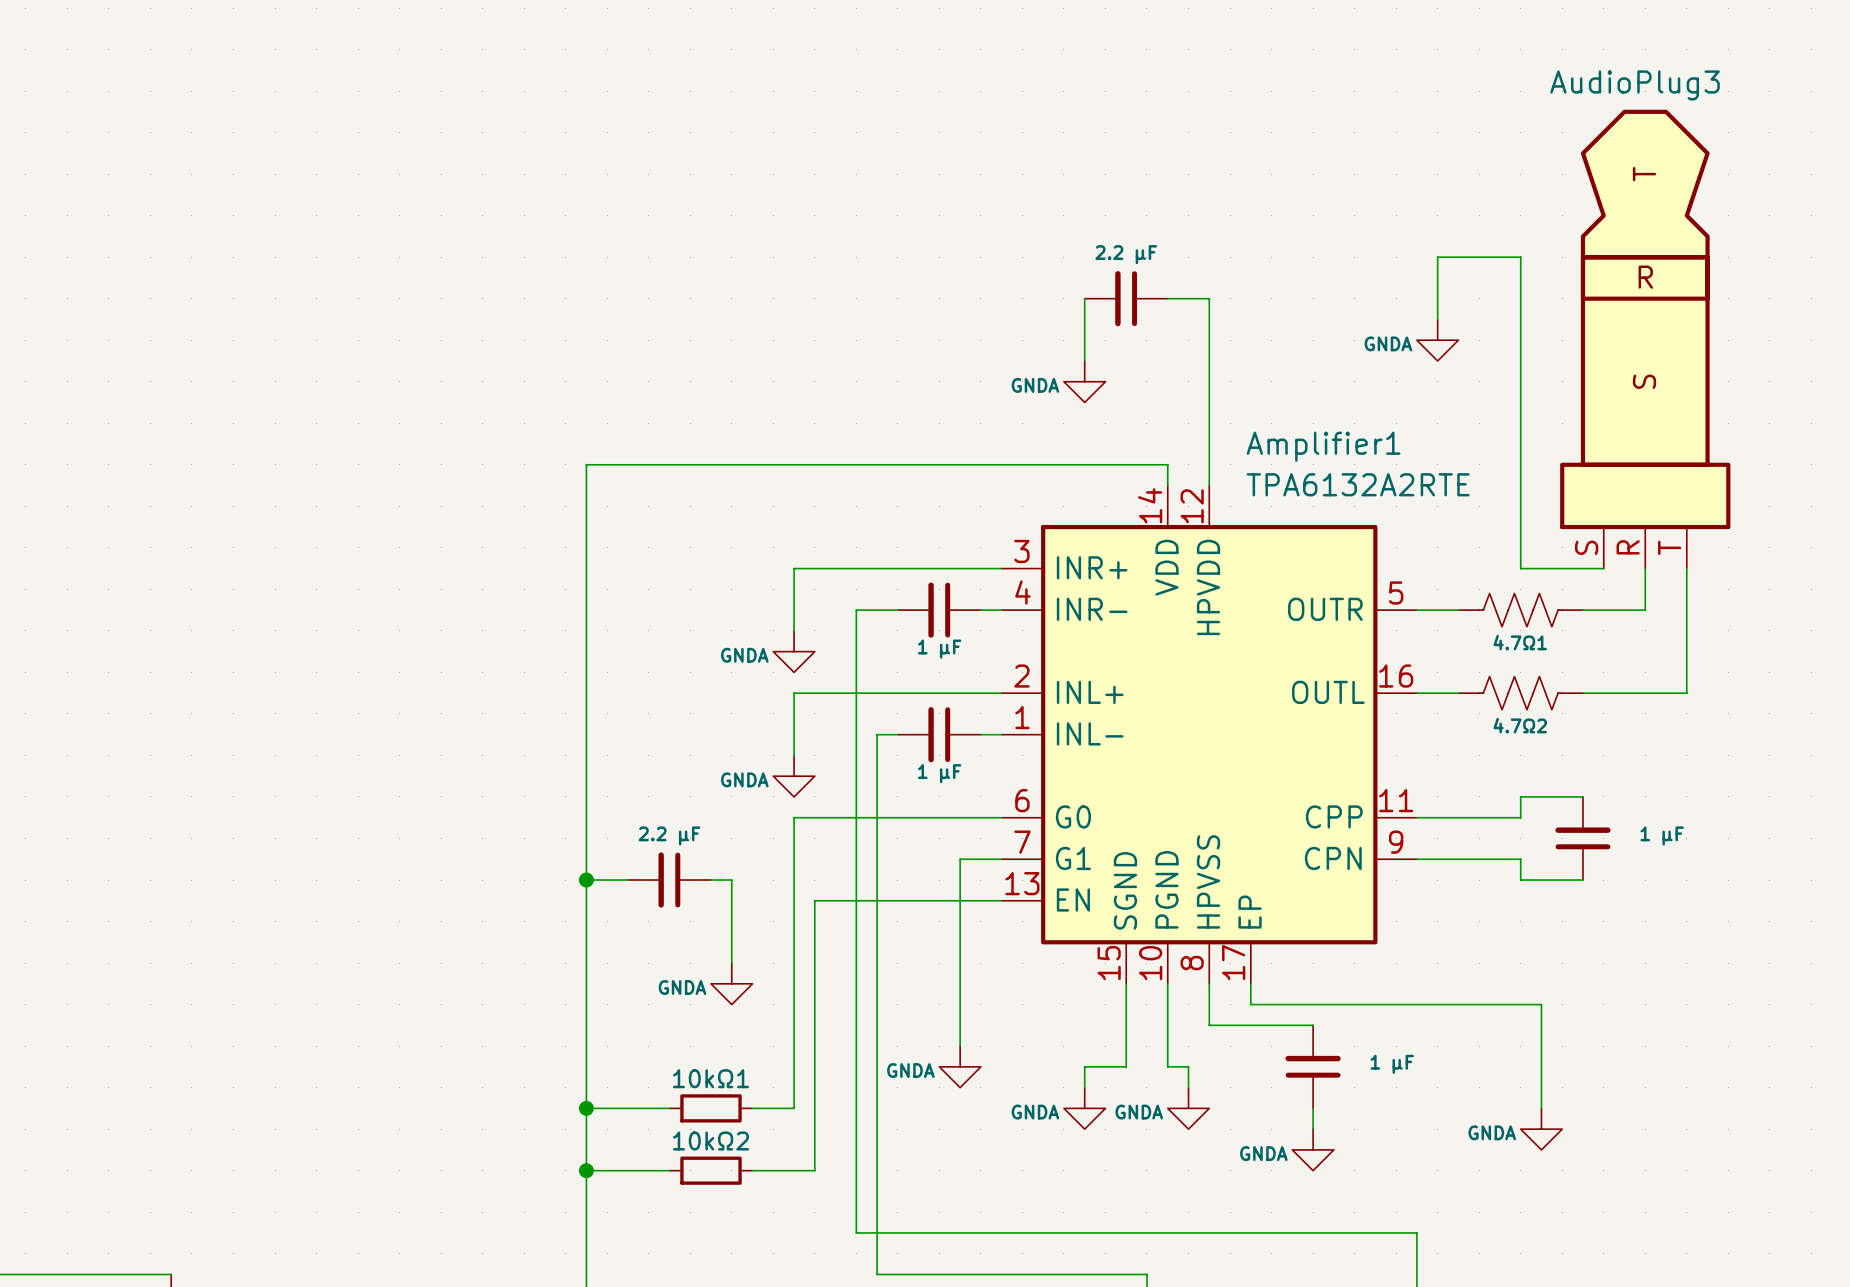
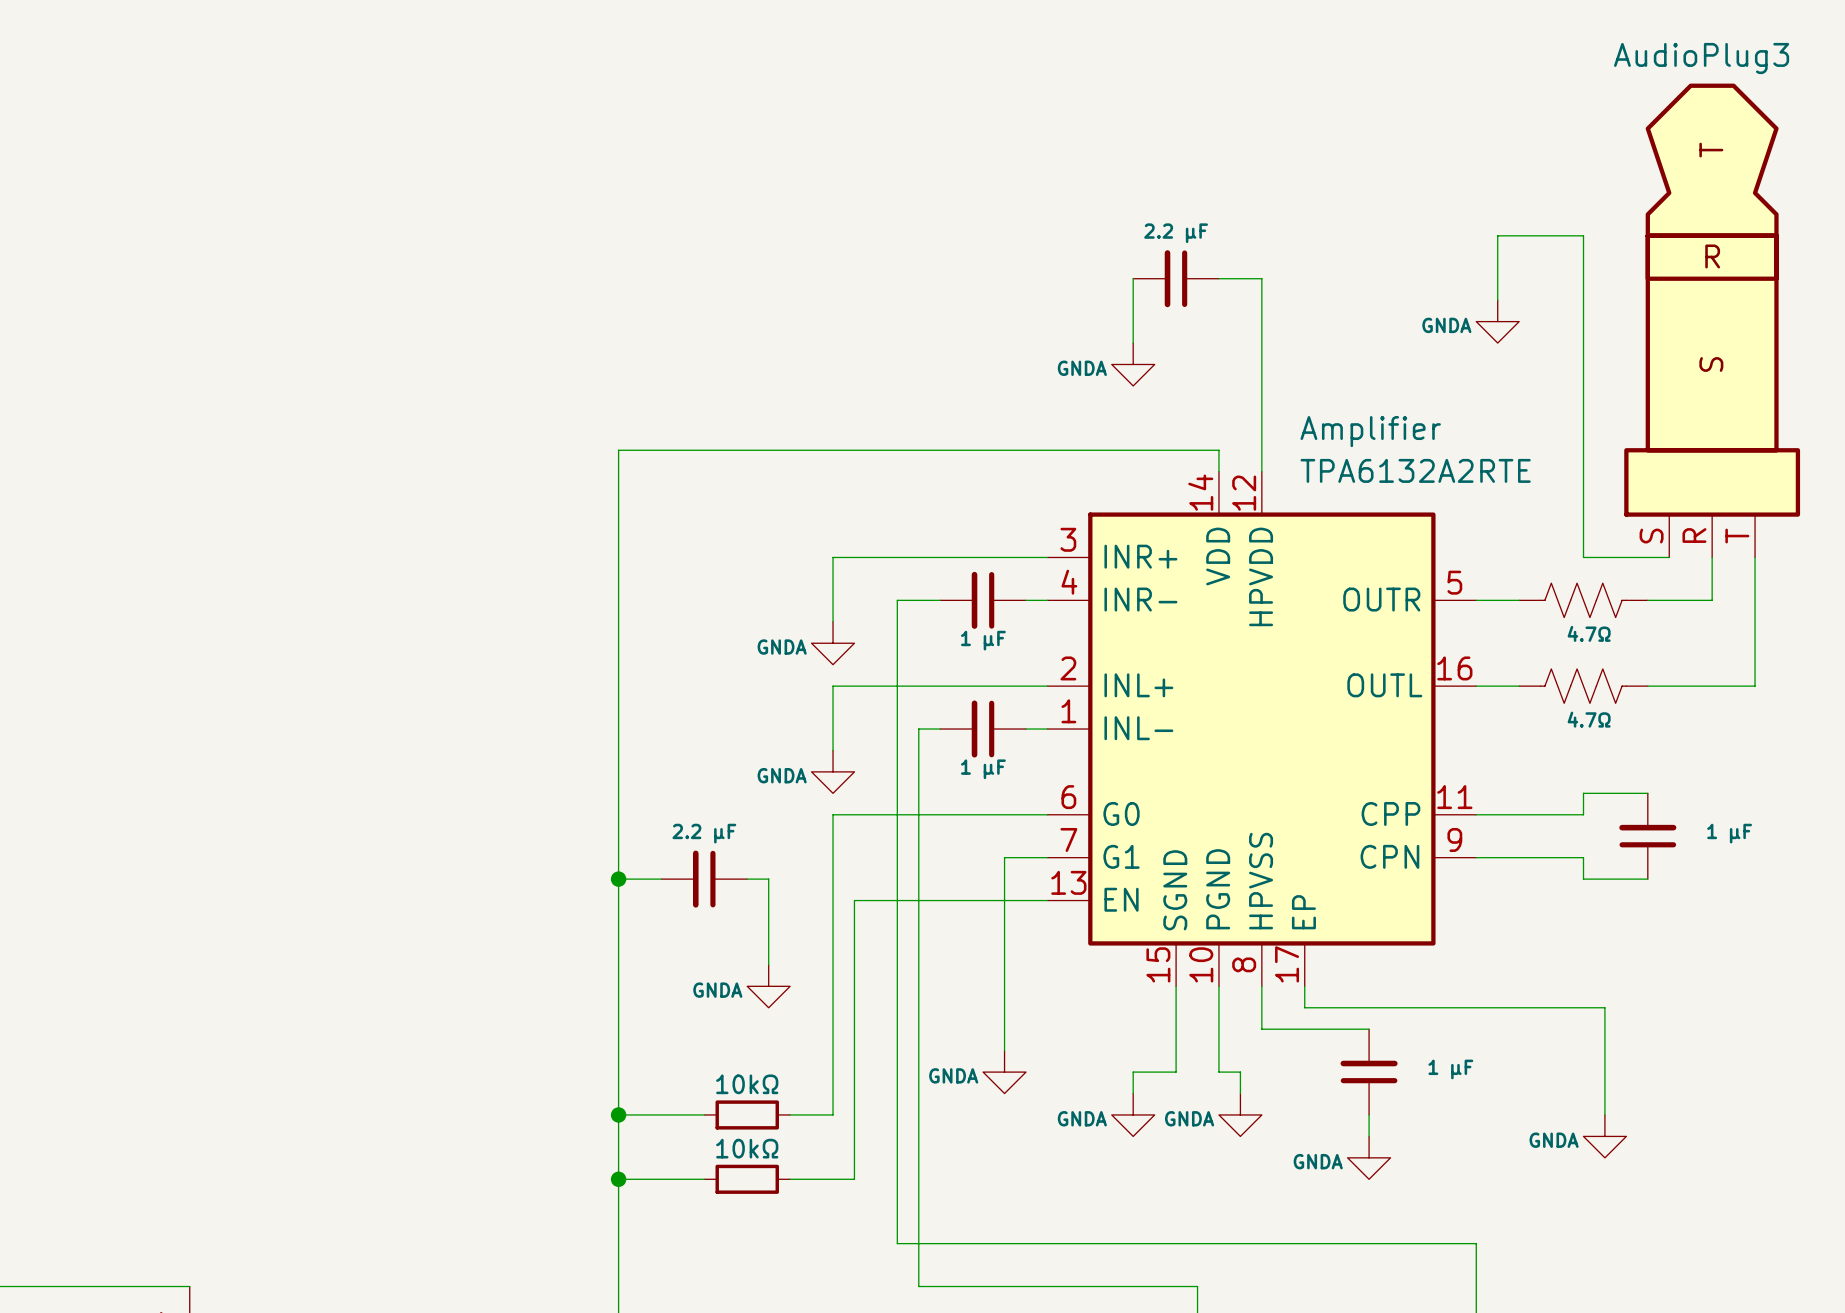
Amplifier1 name: Amplifier1 (1323, 446) -> Amplifier (1370, 431)
4.7Ω1 name: 4.7Ω1 (1520, 642) -> 4.7Ω (1589, 633)
4.7Ω2 name: 4.7Ω2 (1520, 725) -> 4.7Ω (1589, 719)
10kΩ1 name: 10kΩ1 (711, 1078) -> 10kΩ (747, 1084)
10kΩ2 name: 10kΩ2 (711, 1140) -> 10kΩ (747, 1148)

